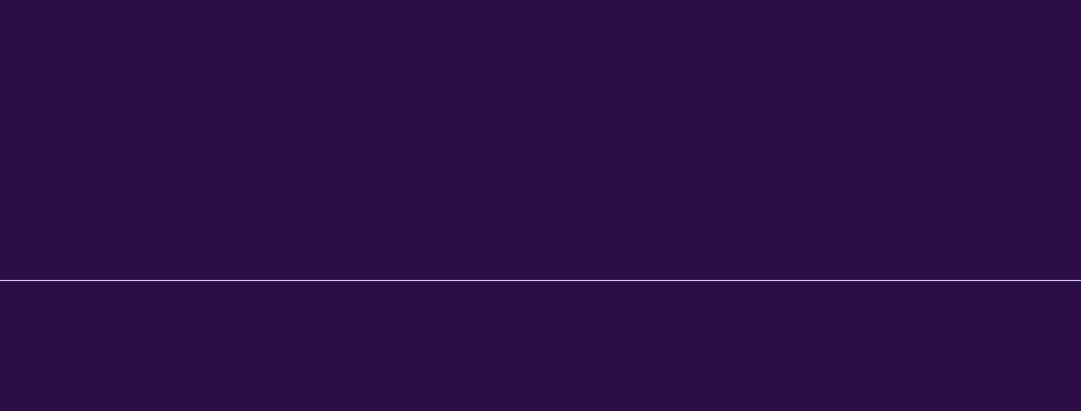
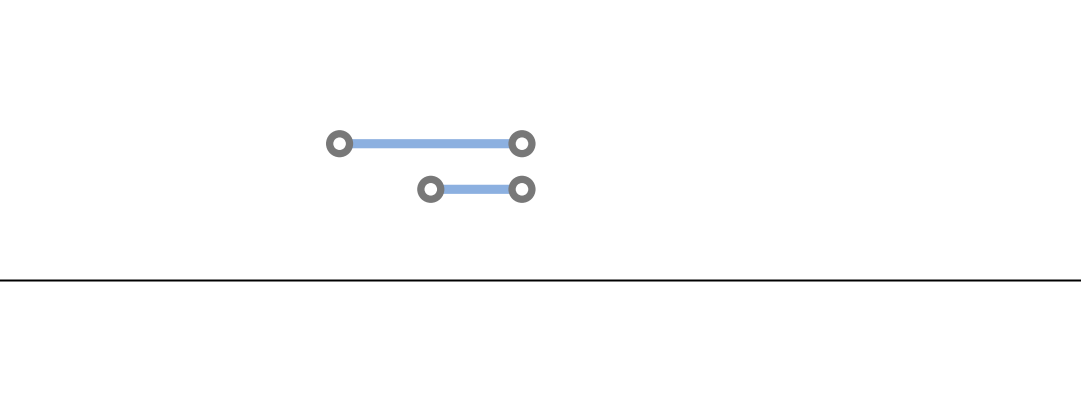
via: none -> (339, 143)
track: none -> (521, 143) (339, 143)
via: none -> (521, 143)
via: none -> (430, 189)
track: none -> (521, 189) (430, 189)
via: none -> (521, 189)

